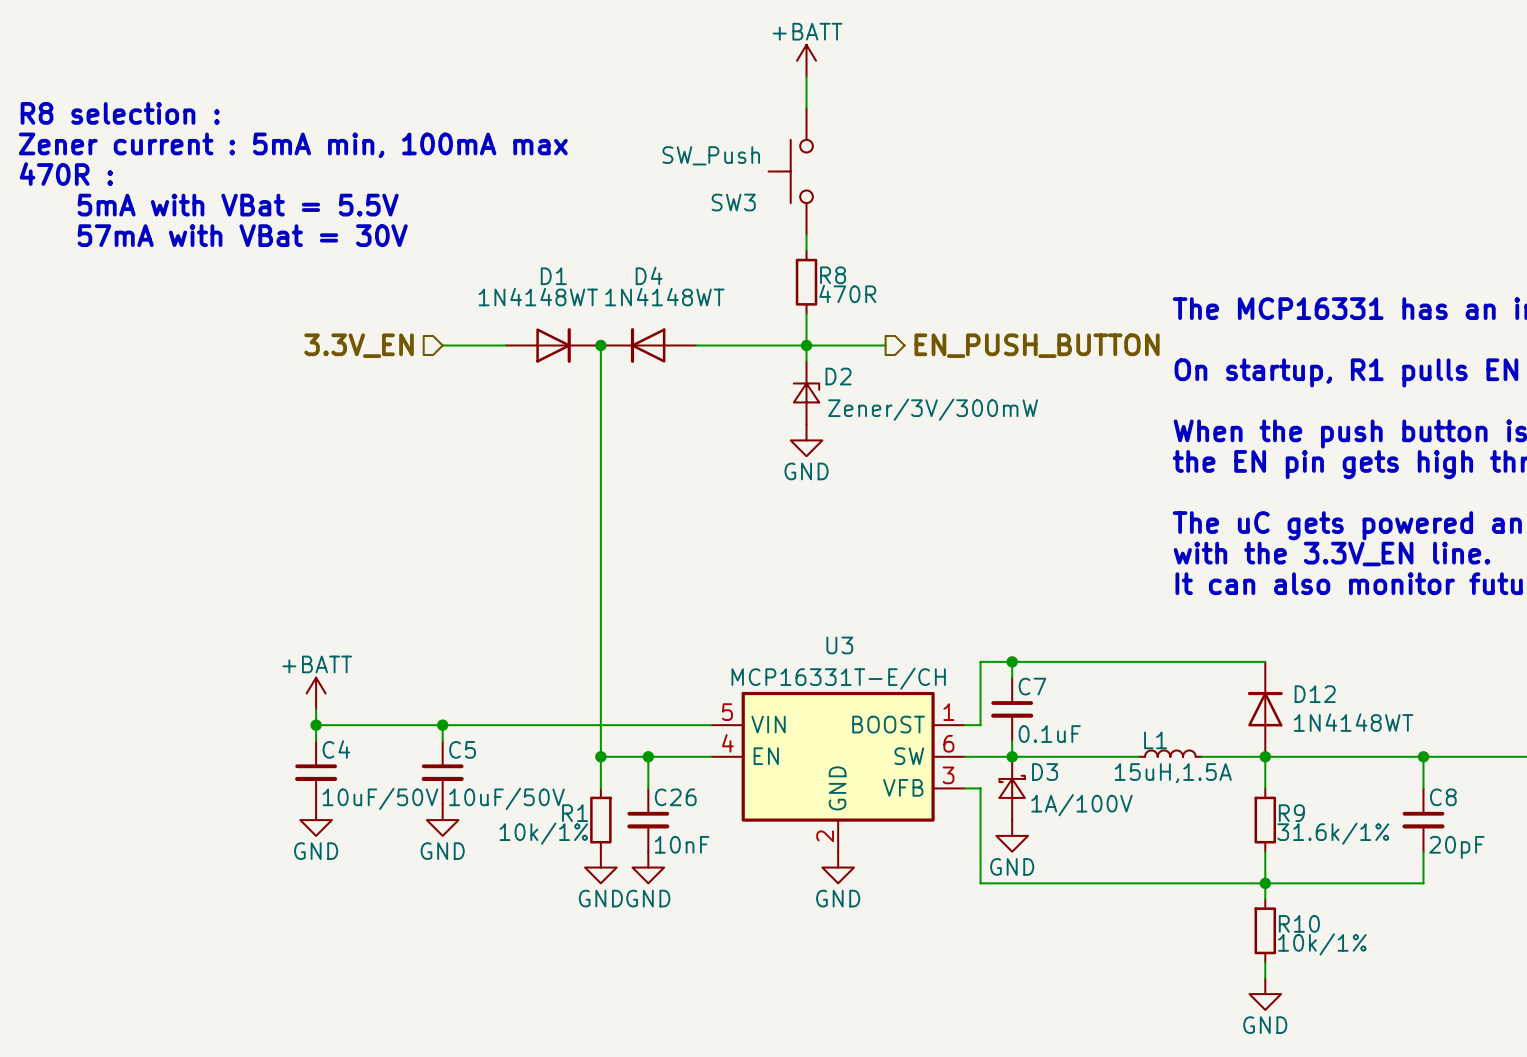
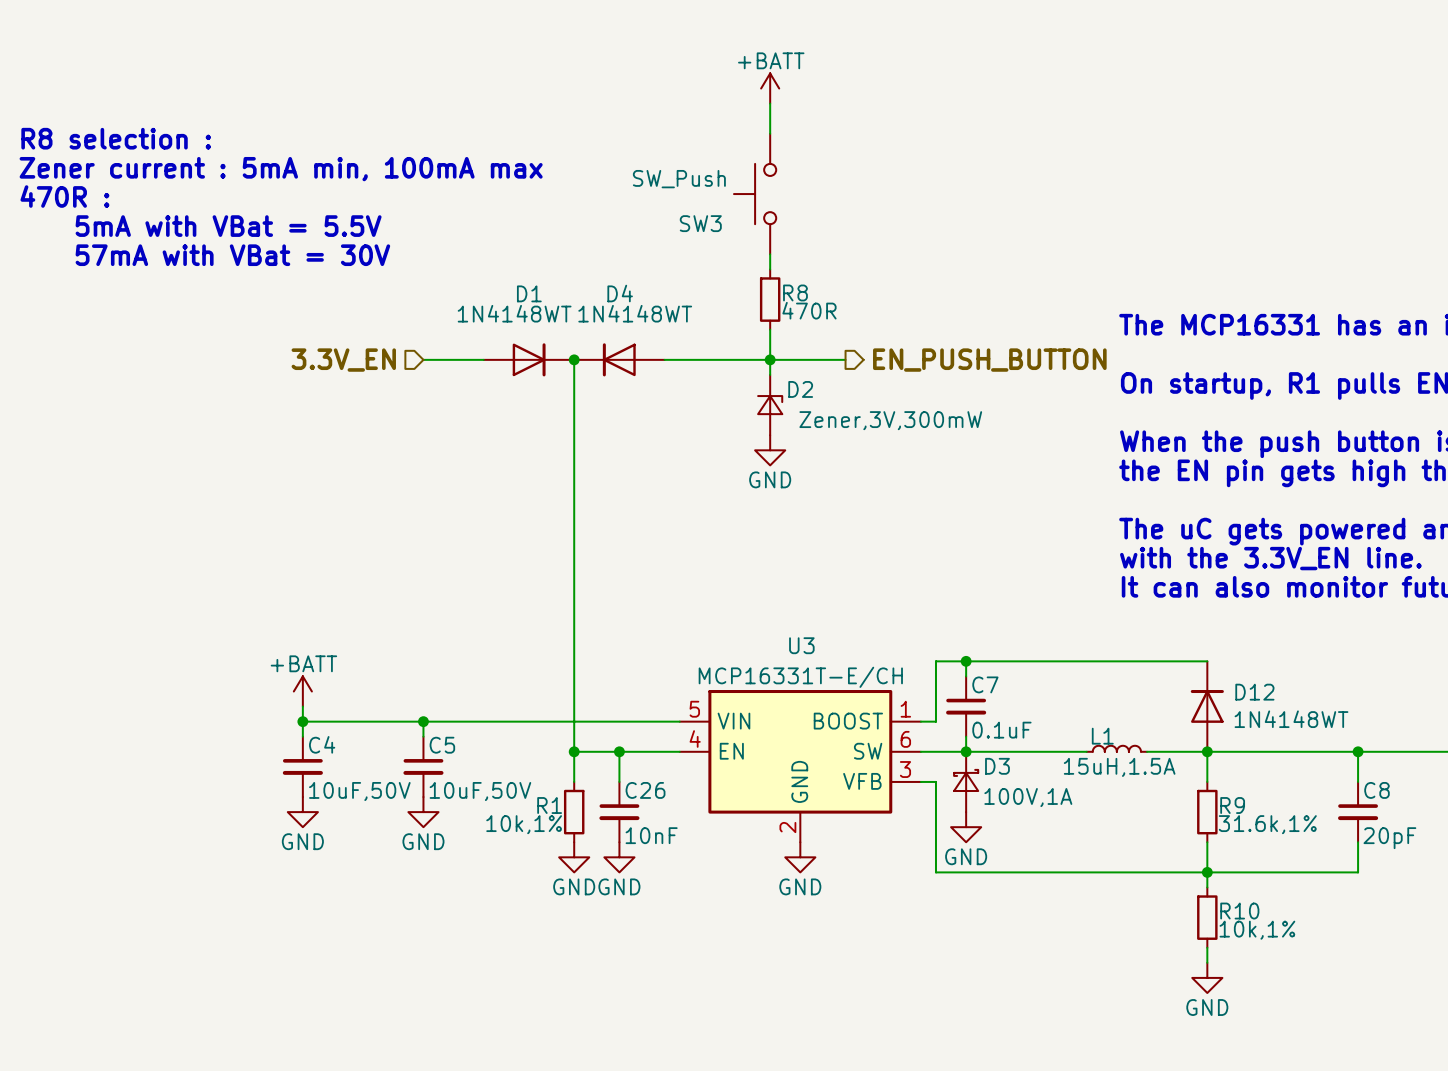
D2 value: Zener/3V/300mW (933, 409) -> Zener,3V,300mW (890, 420)
C4 value: 10uF/50V (380, 798) -> 10uF,50V (359, 791)
C5 value: 10uF/50V (506, 798) -> 10uF,50V (480, 791)
D3 value: 1A/100V (1081, 805) -> 100V,1A (1028, 797)
R1 value: 10k/1% (543, 833) -> 10k,1% (524, 824)
R9 value: 31.6k/1% (1333, 833) -> 31.6k,1% (1267, 824)
R10 value: 10k/1% (1322, 944) -> 10k,1% (1257, 930)

